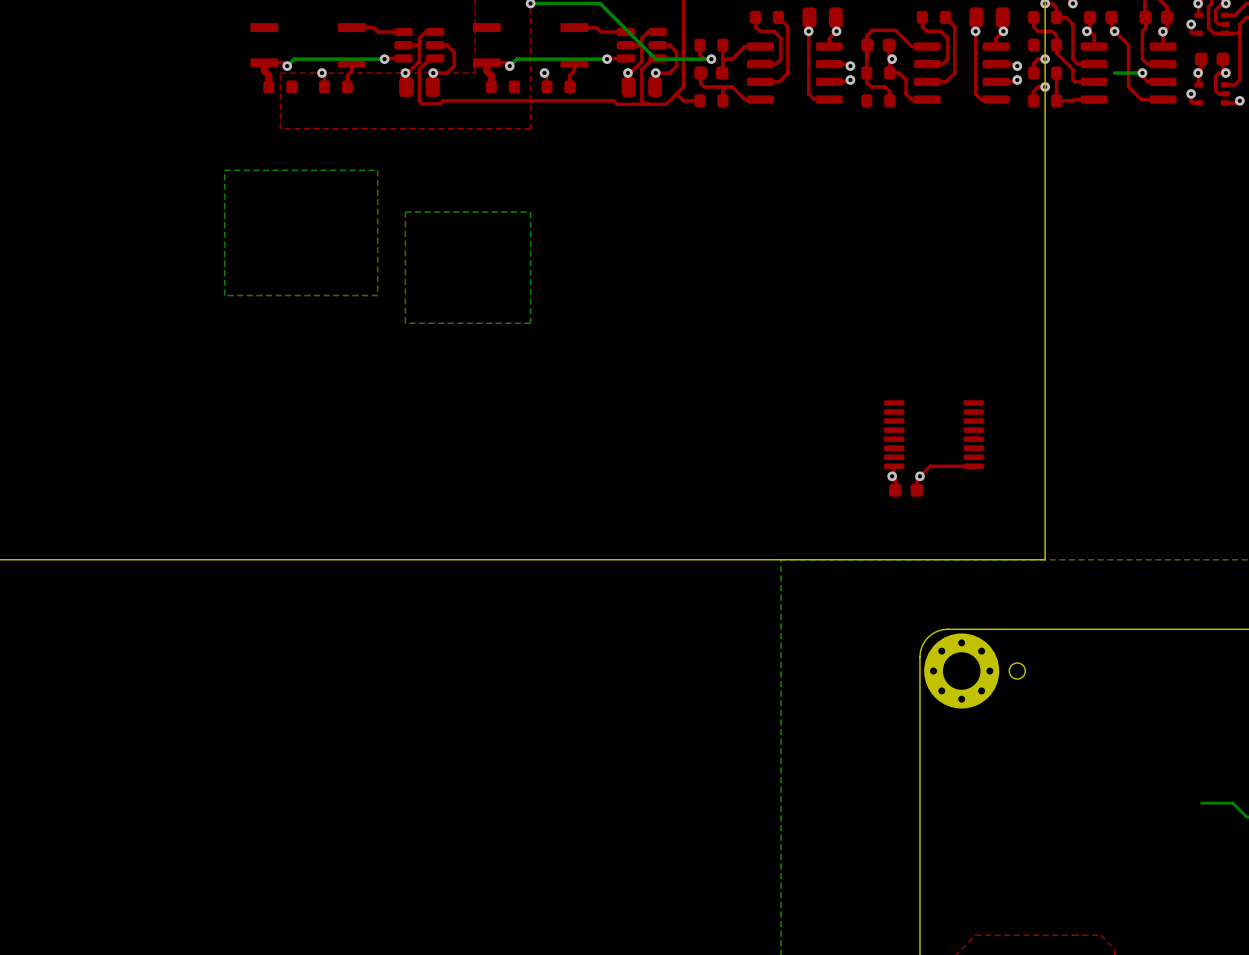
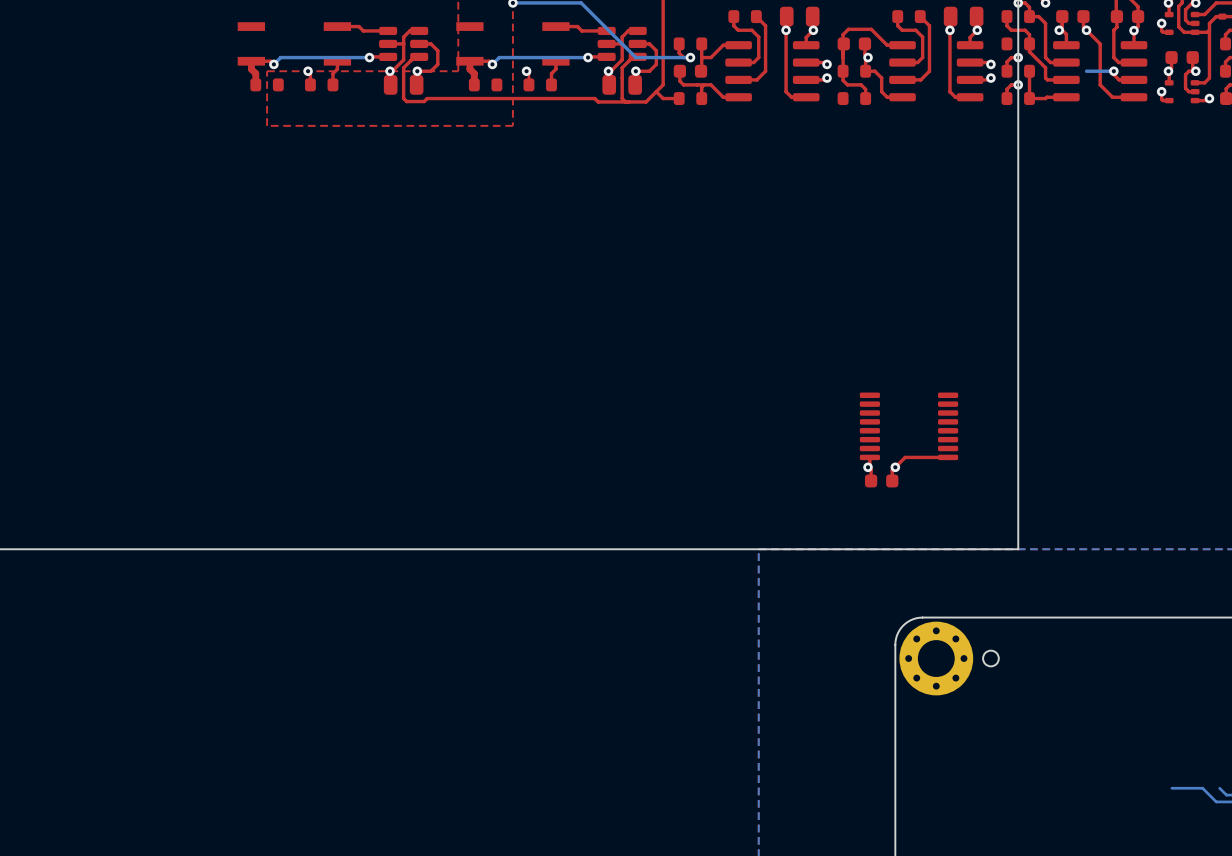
bottom zone outline: (377, 170) (377, 295) (224, 295) (224, 170) (377, 170) -> none
bottom zone outline: (530, 212) (530, 323) (405, 323) (405, 212) (530, 212) -> none

